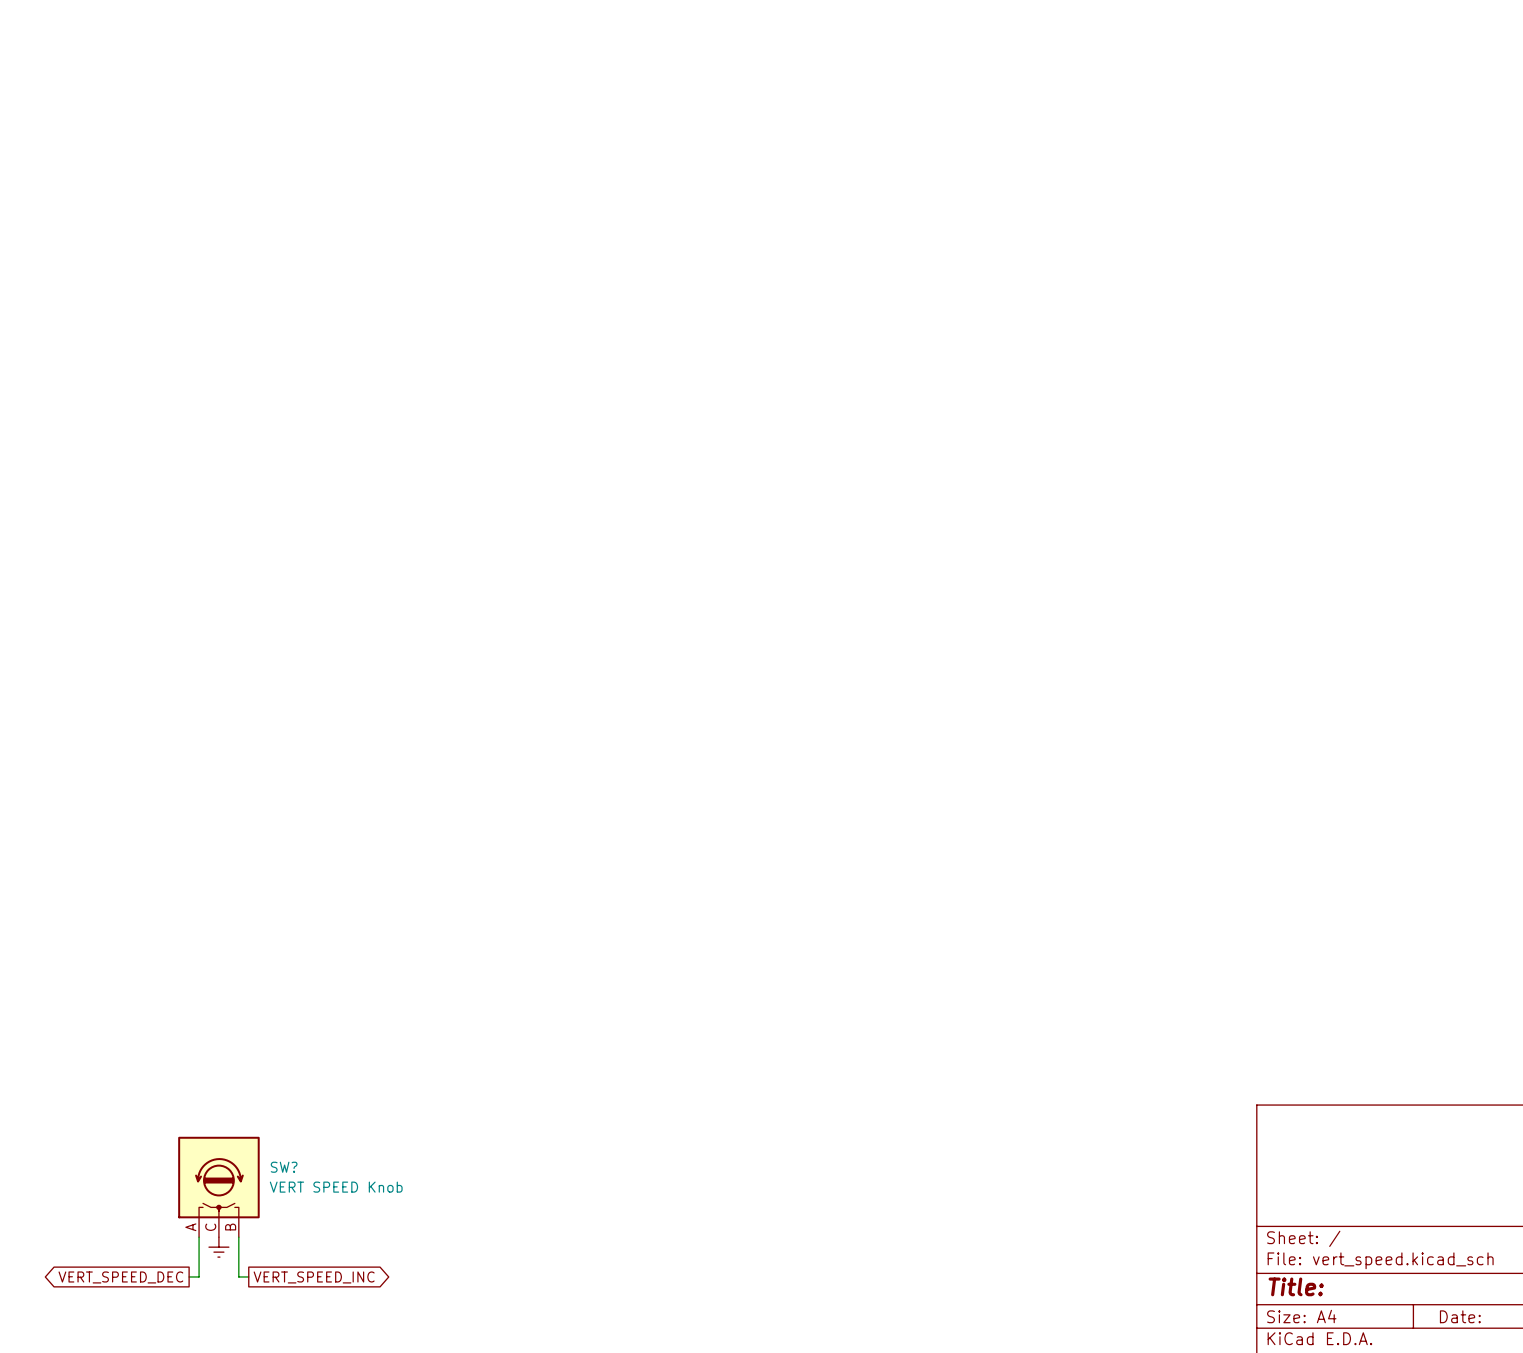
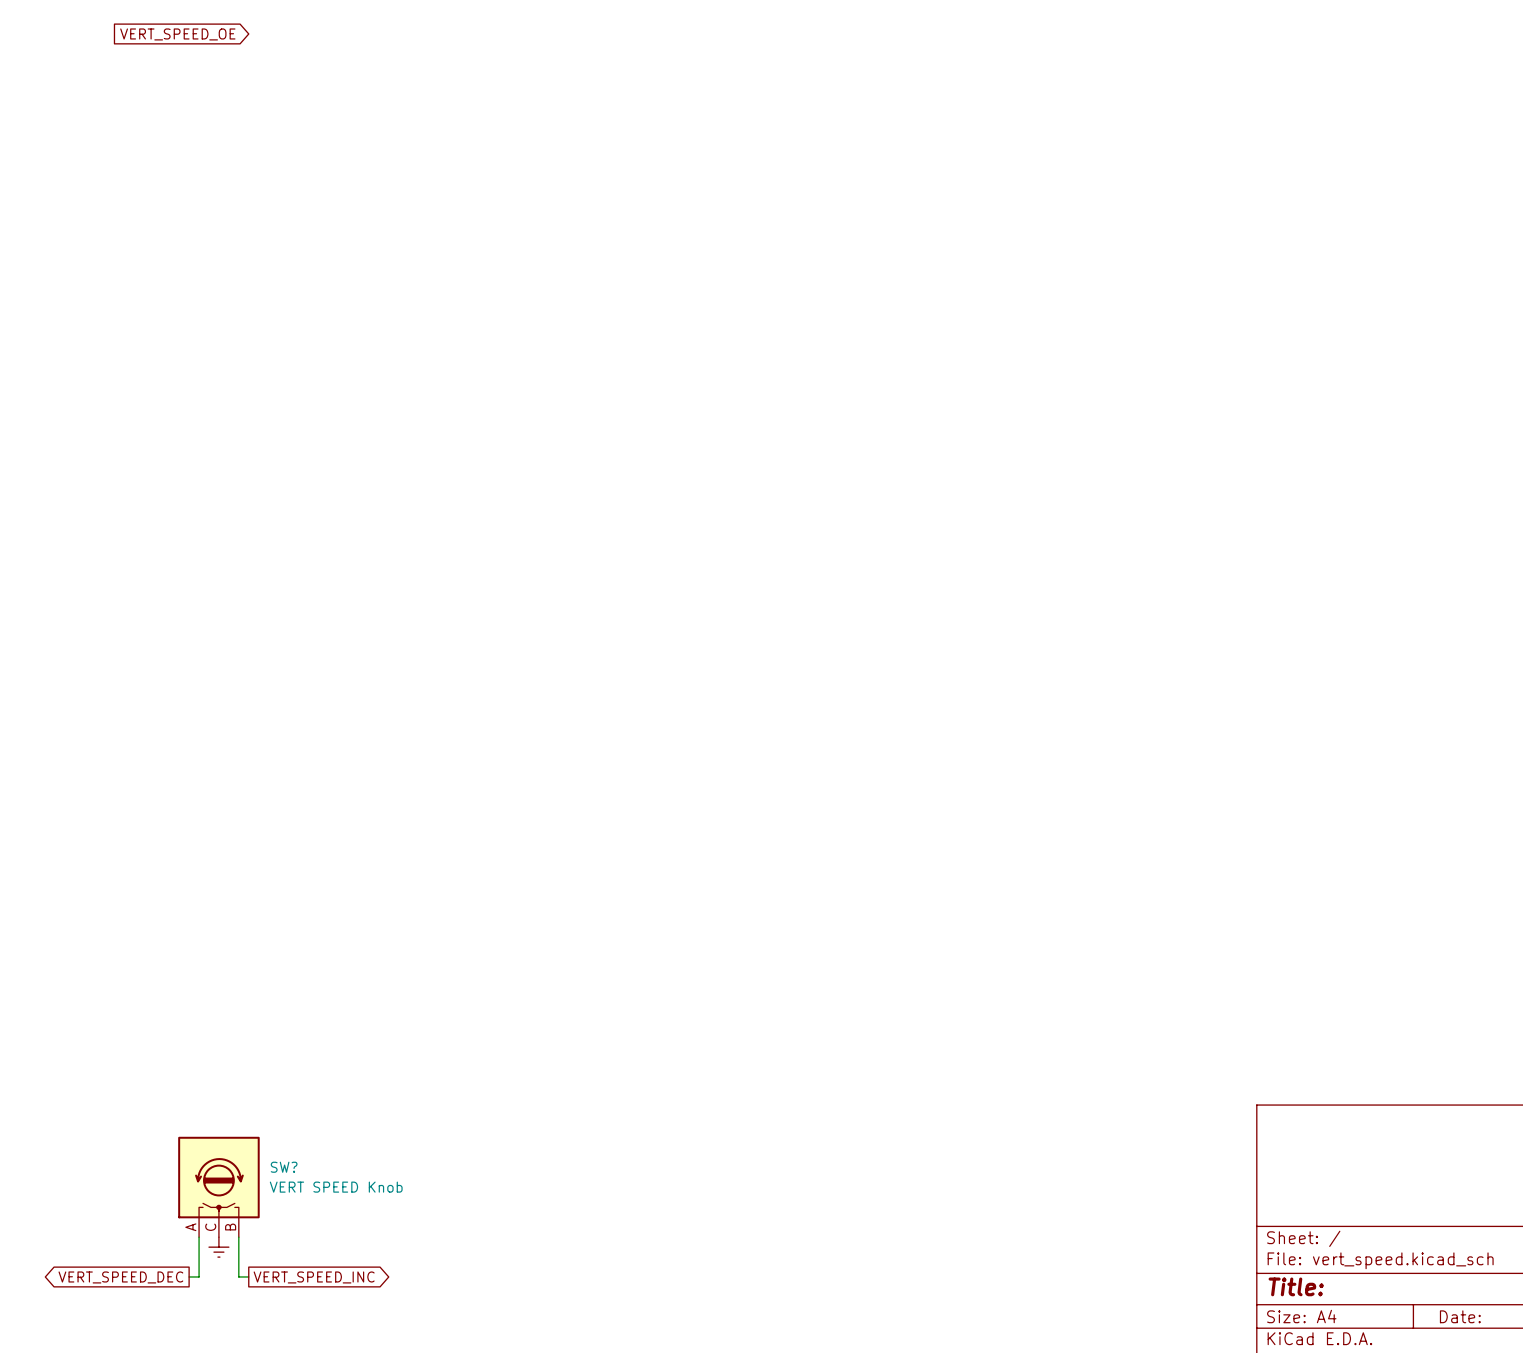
global label: none -> VERT_SPEED_OE (177, 34)

